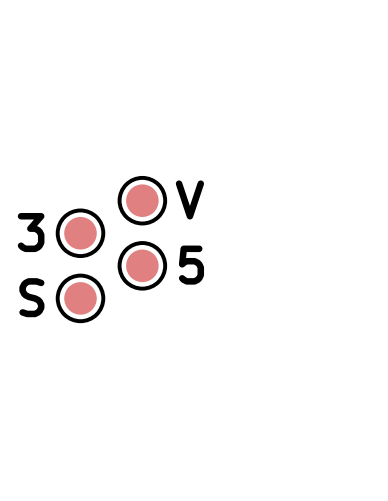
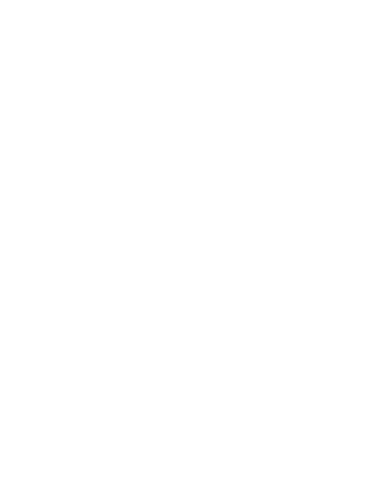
text: V (189, 199) -> none
part: (142, 200) -> none
text: 3 (31, 232) -> none
part: (80, 233) -> none
part: (142, 265) -> none
text: 5 (191, 265) -> none
text: S (31, 297) -> none
part: (80, 298) -> none

